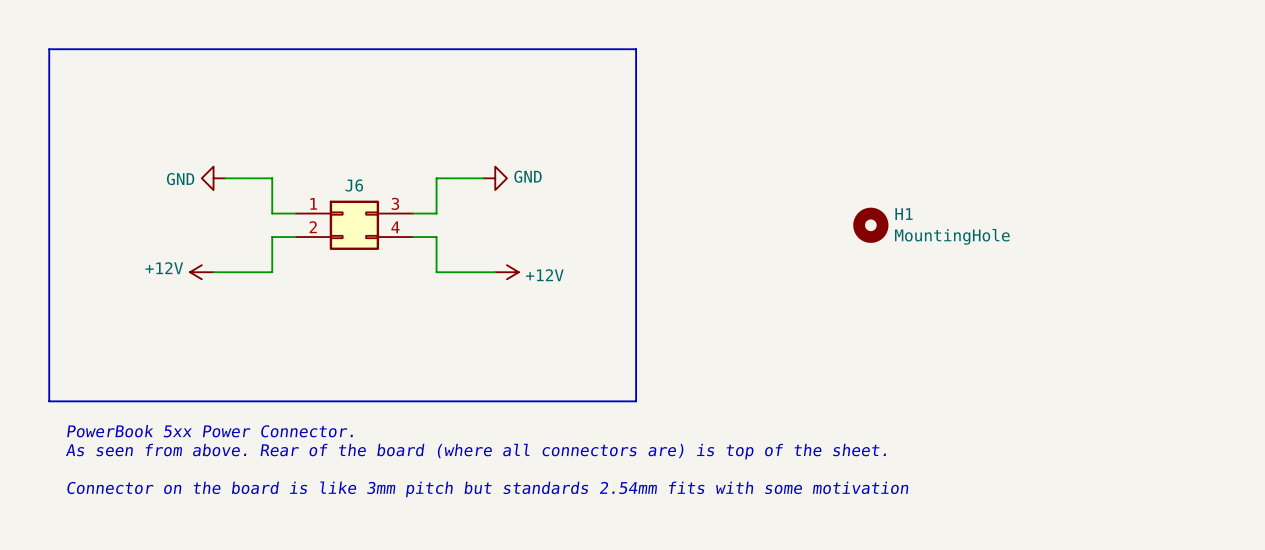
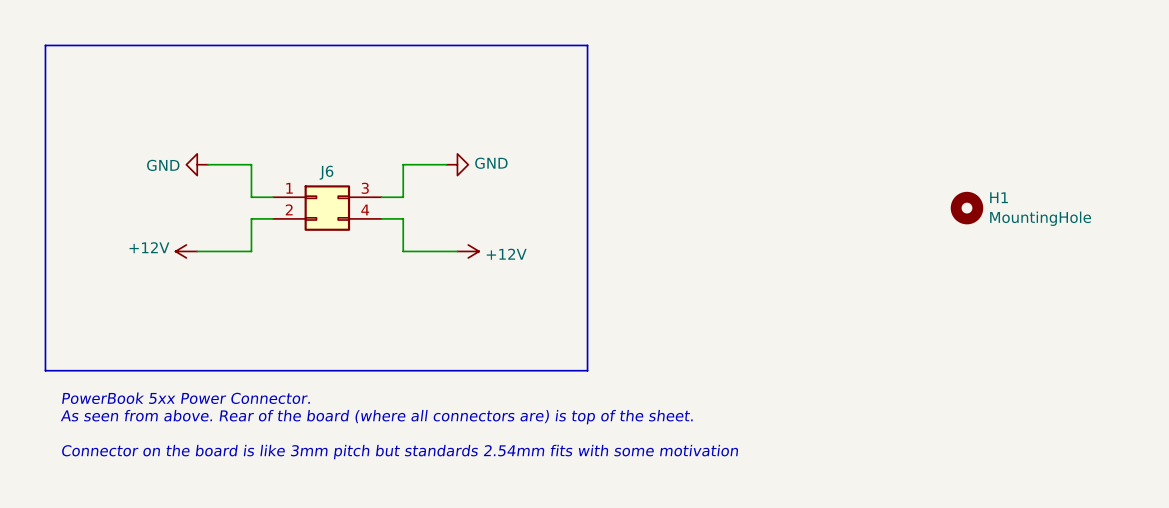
H1 position: (870, 225) -> (966, 208)

